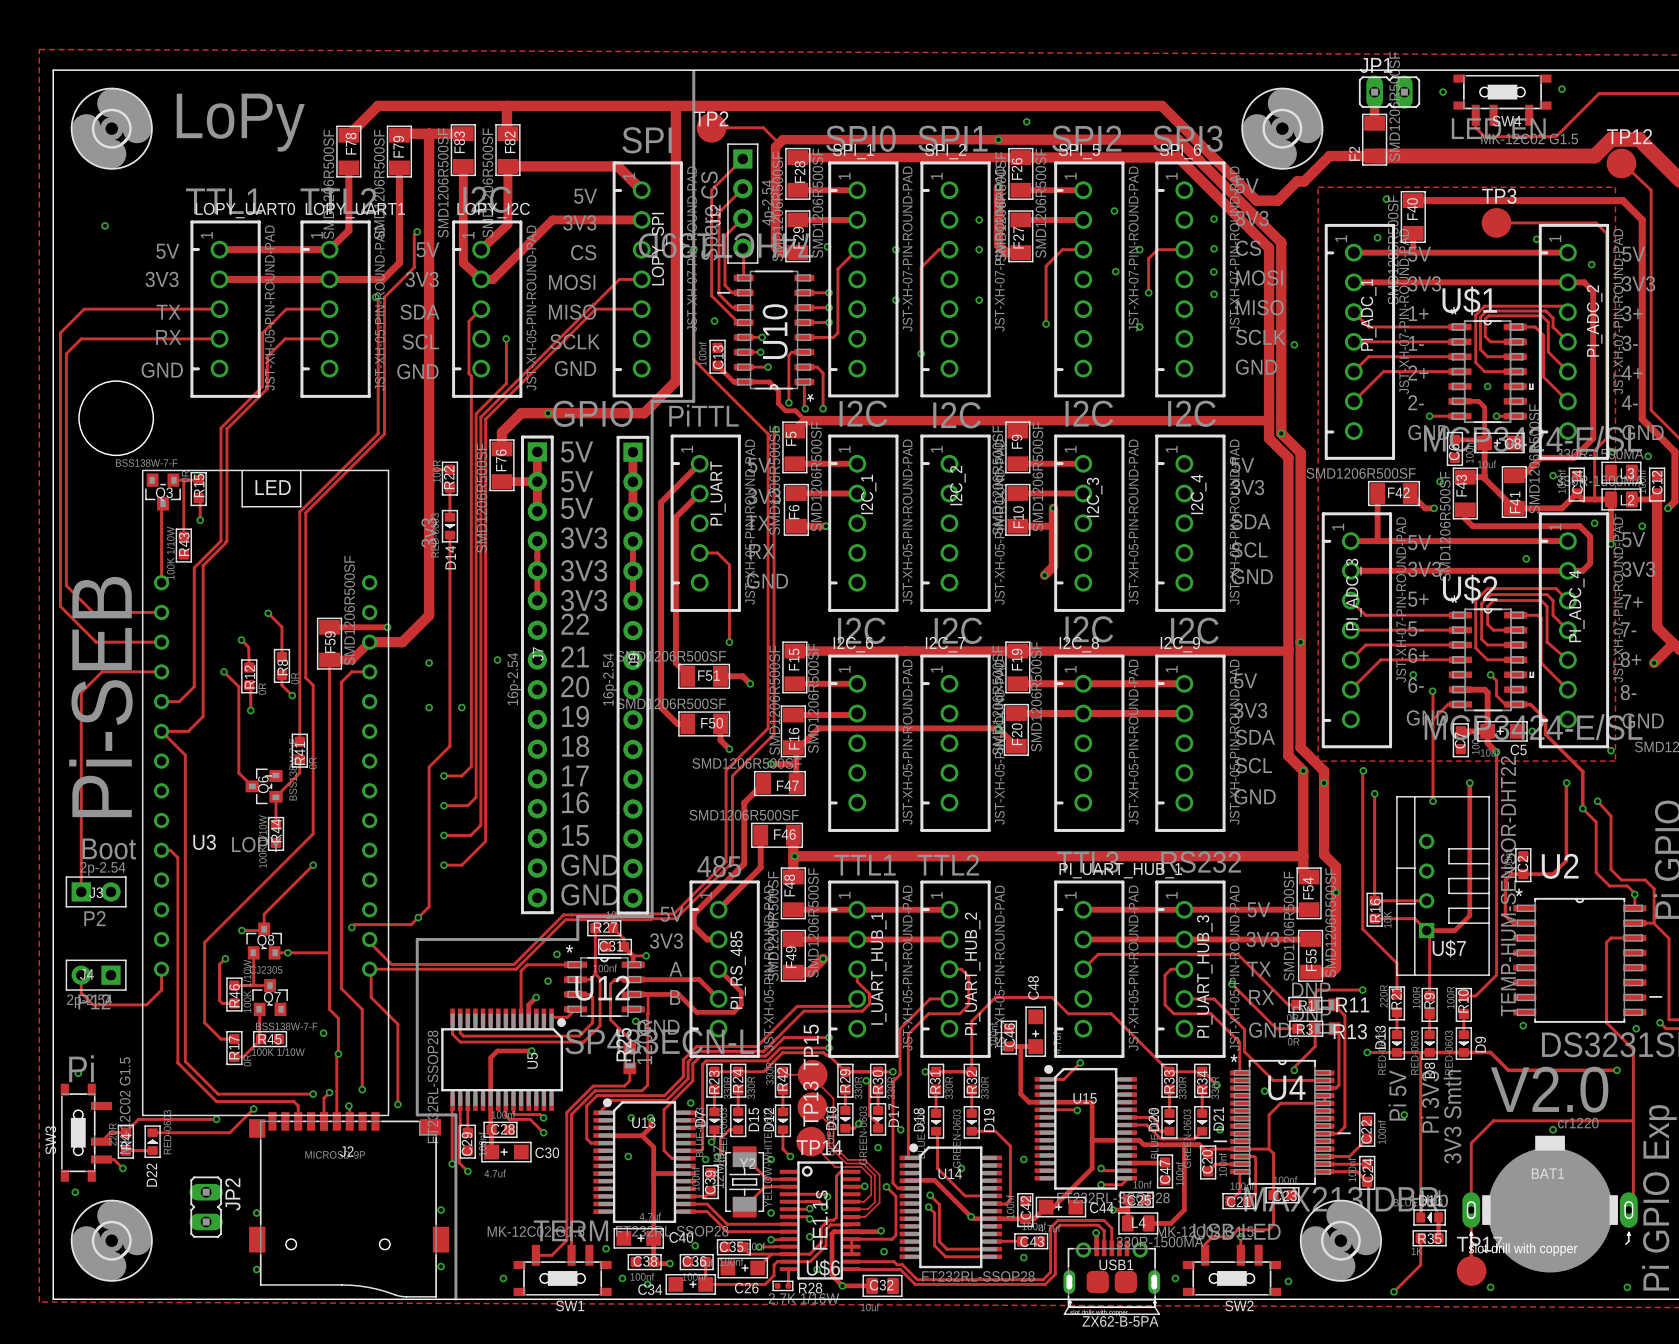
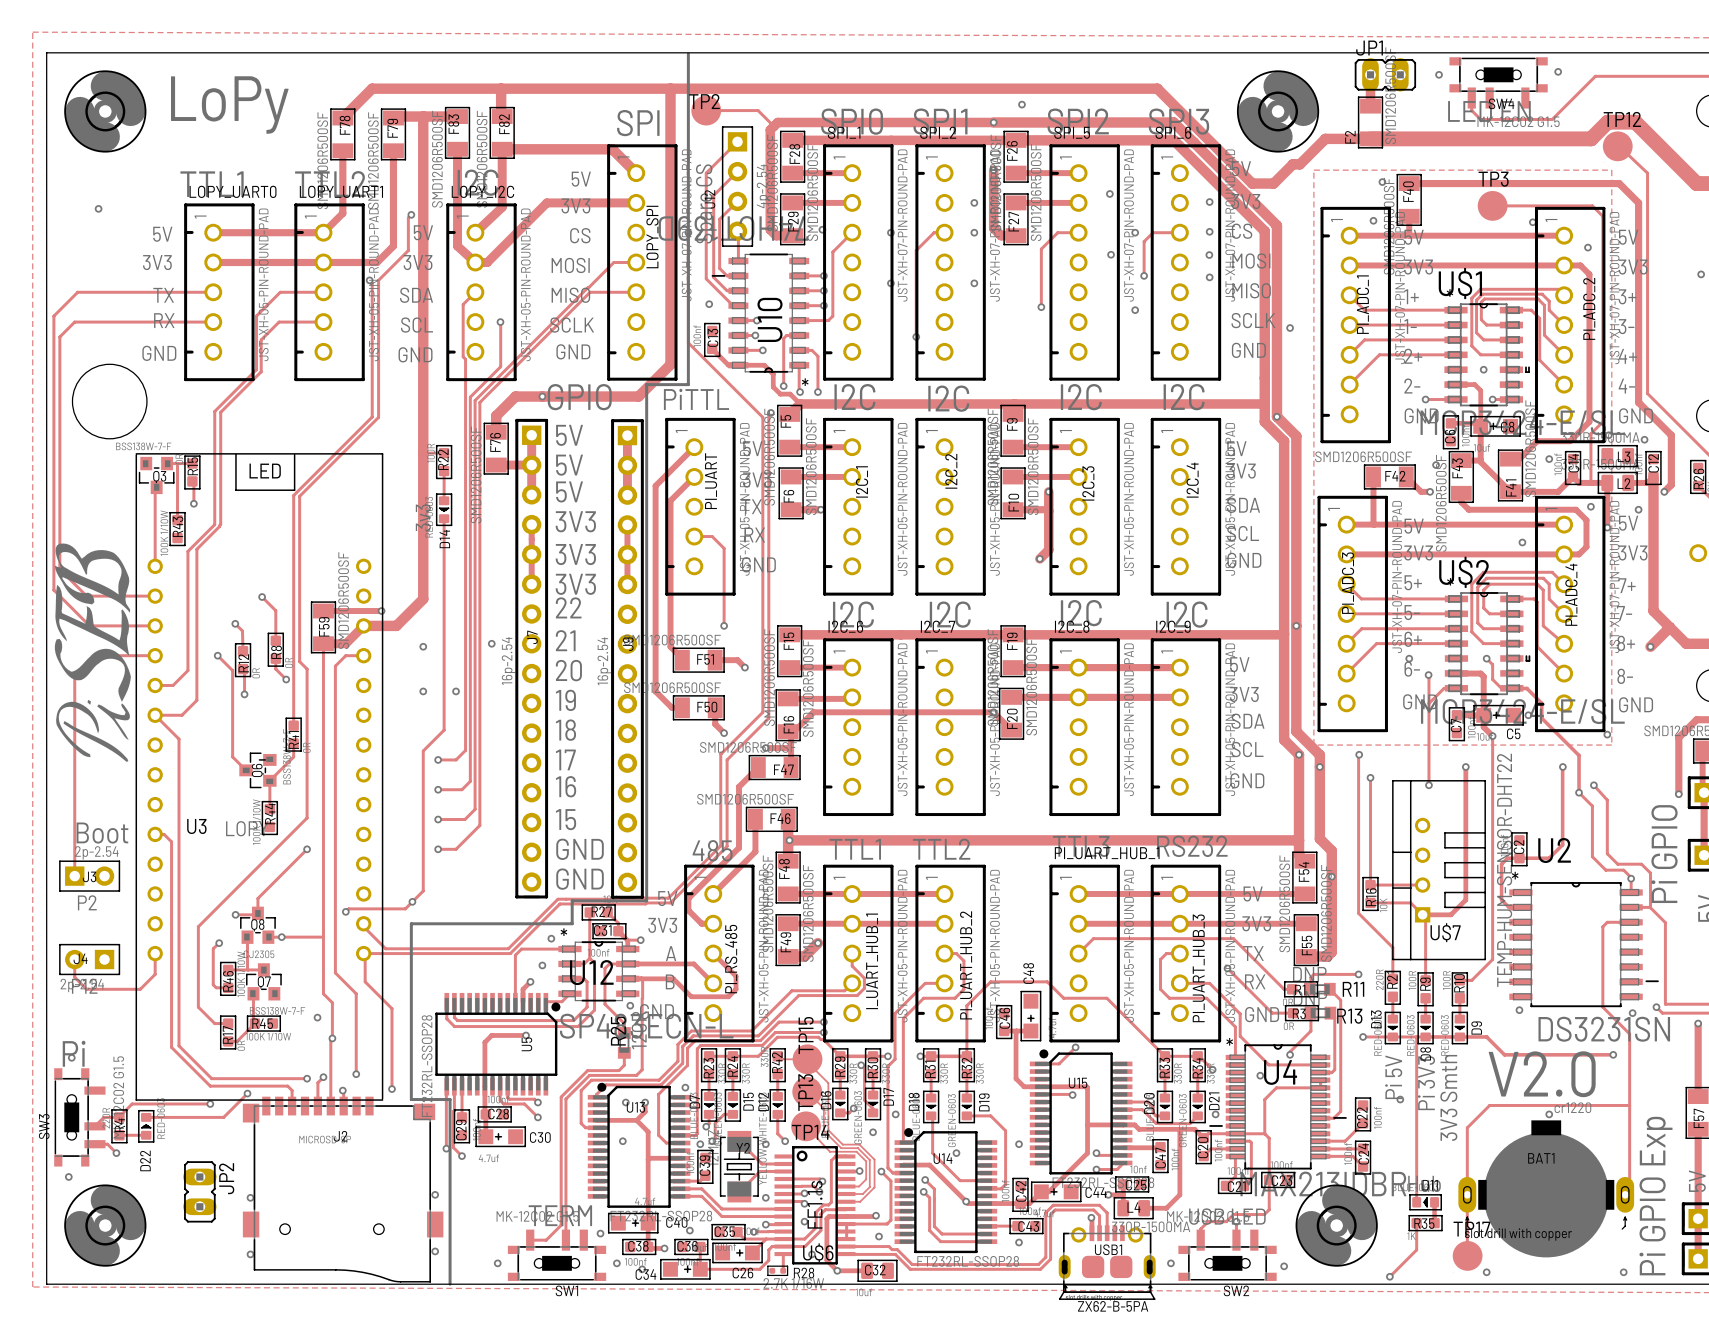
drawing: none -> [54, 543, 131, 762]
text: Pi-SEB (100, 697) -> none

